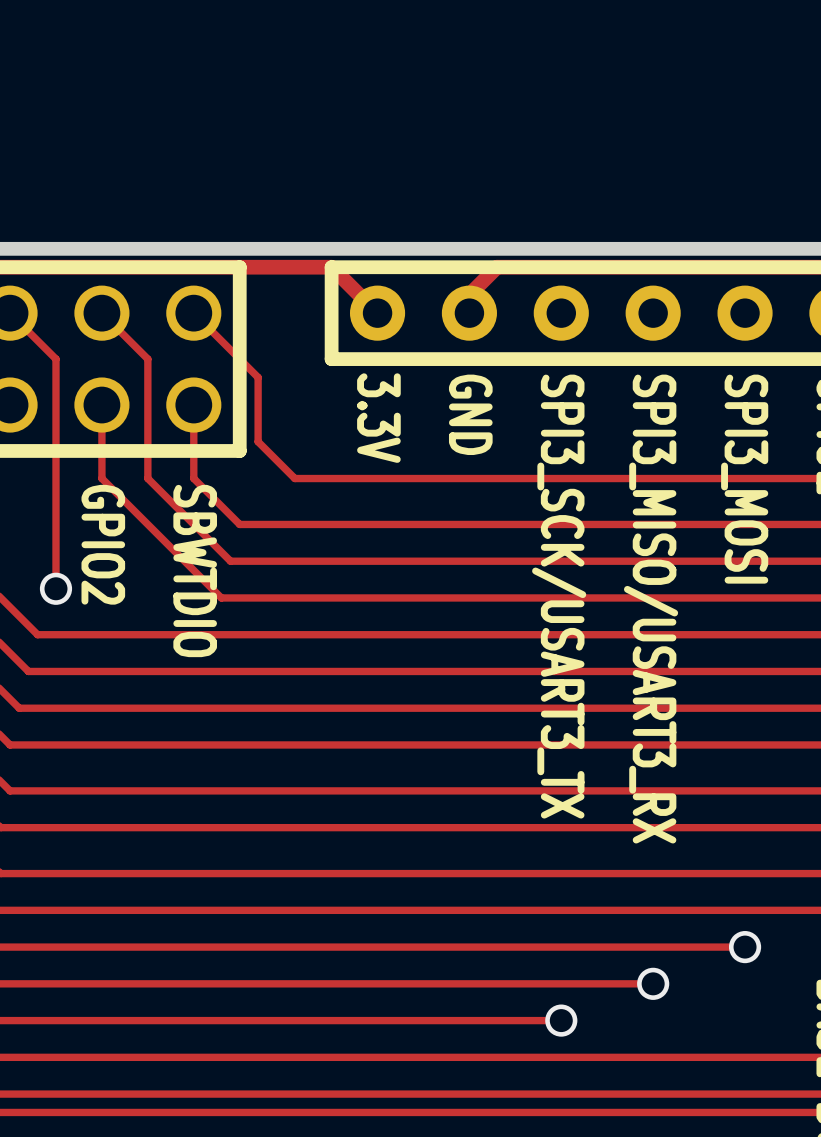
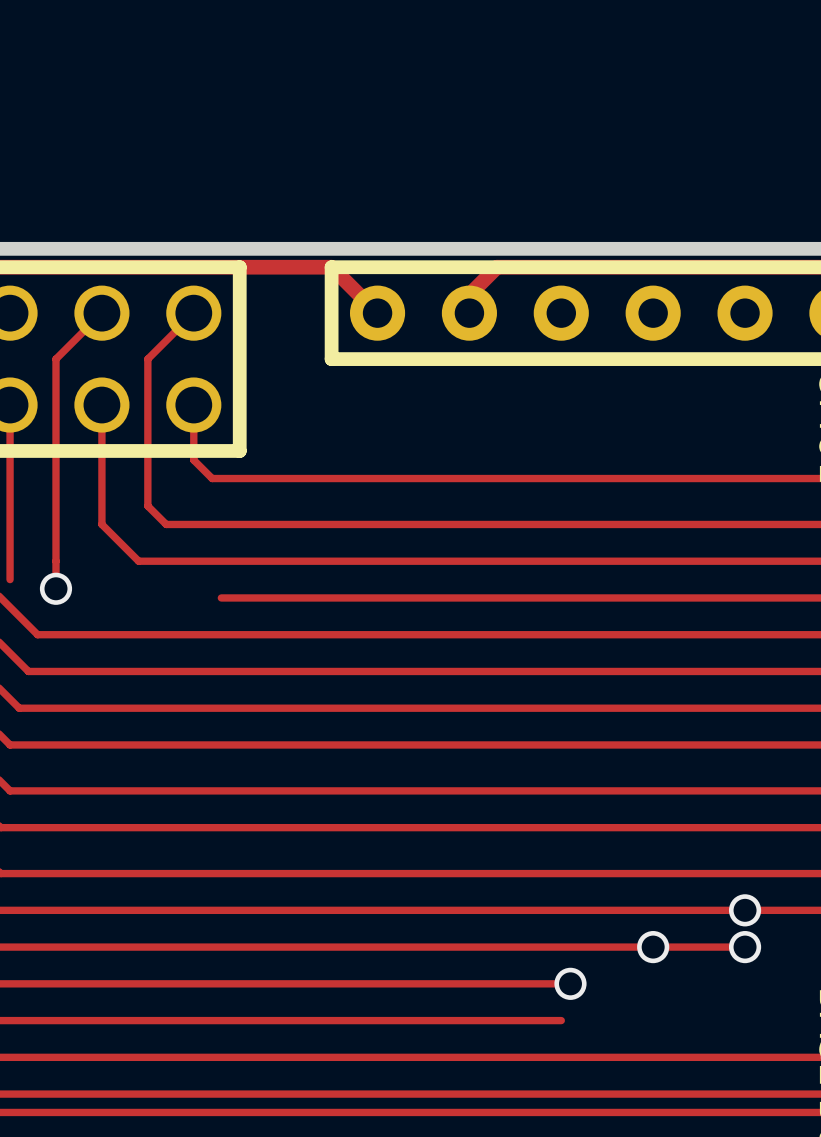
track: (10, 313) (55, 359) -> (101, 313) (55, 359)
track: (101, 313) (147, 359) -> (193, 313) (147, 359)
track: (193, 313) (258, 377) (258, 441) (294, 478) -> none
track: none -> (10, 405) (10, 579)
text: GND (470, 414) -> none
text: 3.3V (378, 418) -> none
track: (193, 460) (193, 478) (239, 524) -> (193, 460) (212, 478) (294, 478)
track: (101, 478) (221, 597) -> (101, 478) (101, 524) (138, 561) (230, 561)
track: (147, 478) (230, 561) -> (147, 478) (147, 506) (166, 524) (239, 524)
text: SPI3_MOSI (744, 479) -> none
text: GPIO2 (103, 544) -> none
text: SBWTDIO (195, 571) -> none
text: SPI3_SCK/USART3_TX (559, 596) -> none
text: SPI3_MISO/USART3_RX (651, 609) -> none
via: none -> (745, 910)
track: (570, 983) (653, 983) -> none
via position: (653, 983) -> (653, 947)
via position: (561, 1020) -> (570, 983)

